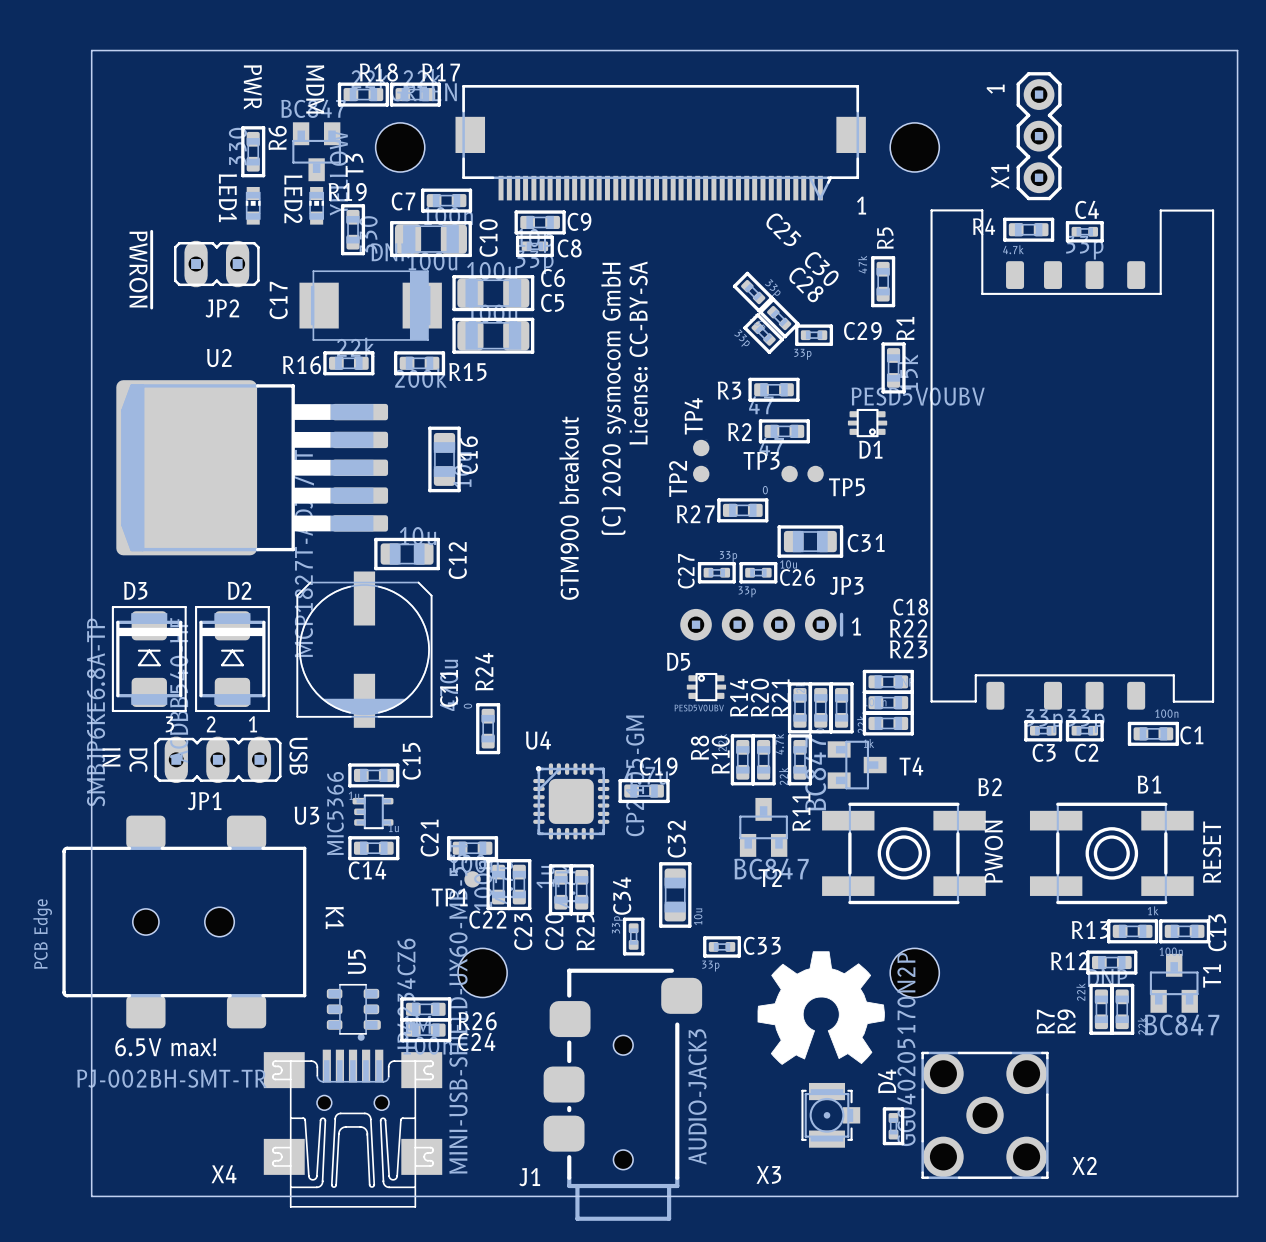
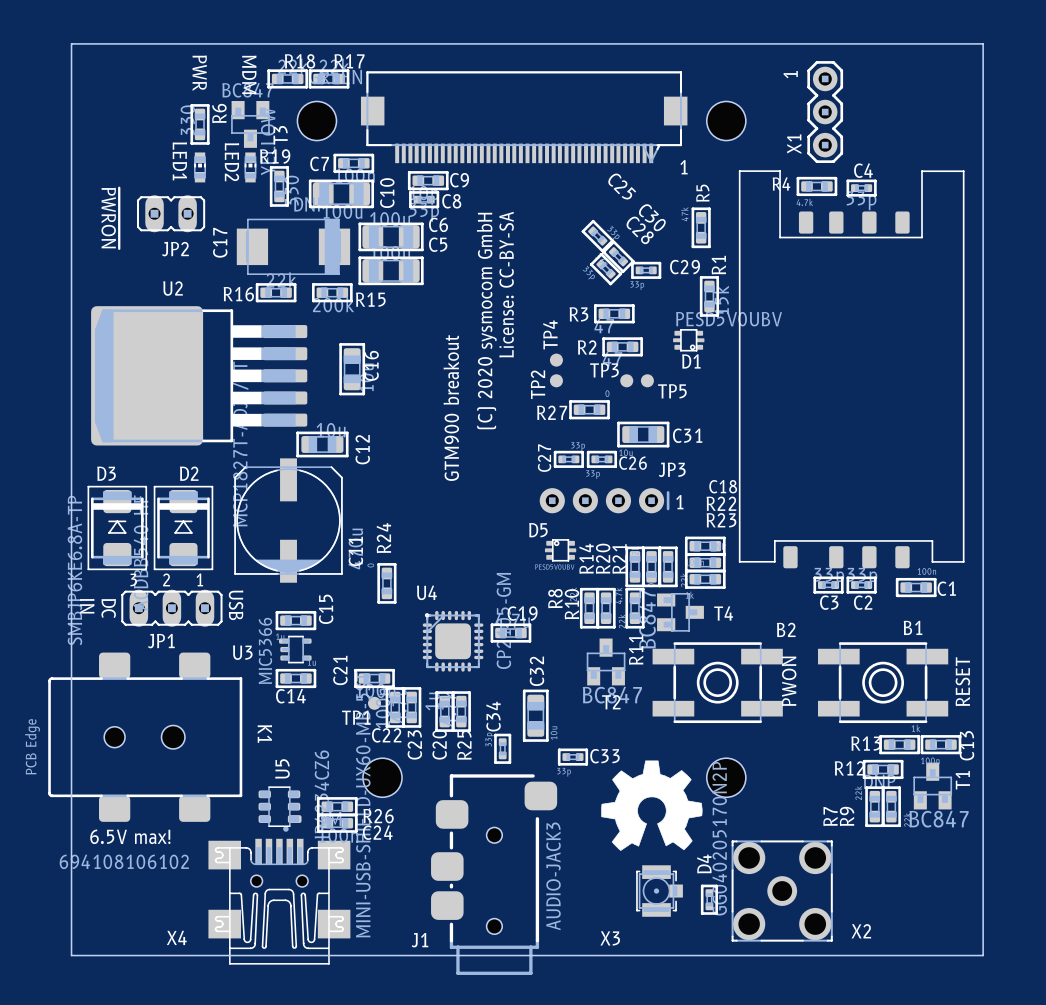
K1 value: PJ-002BH-SMT-TR (171, 1078) -> 694108106102 (124, 861)

